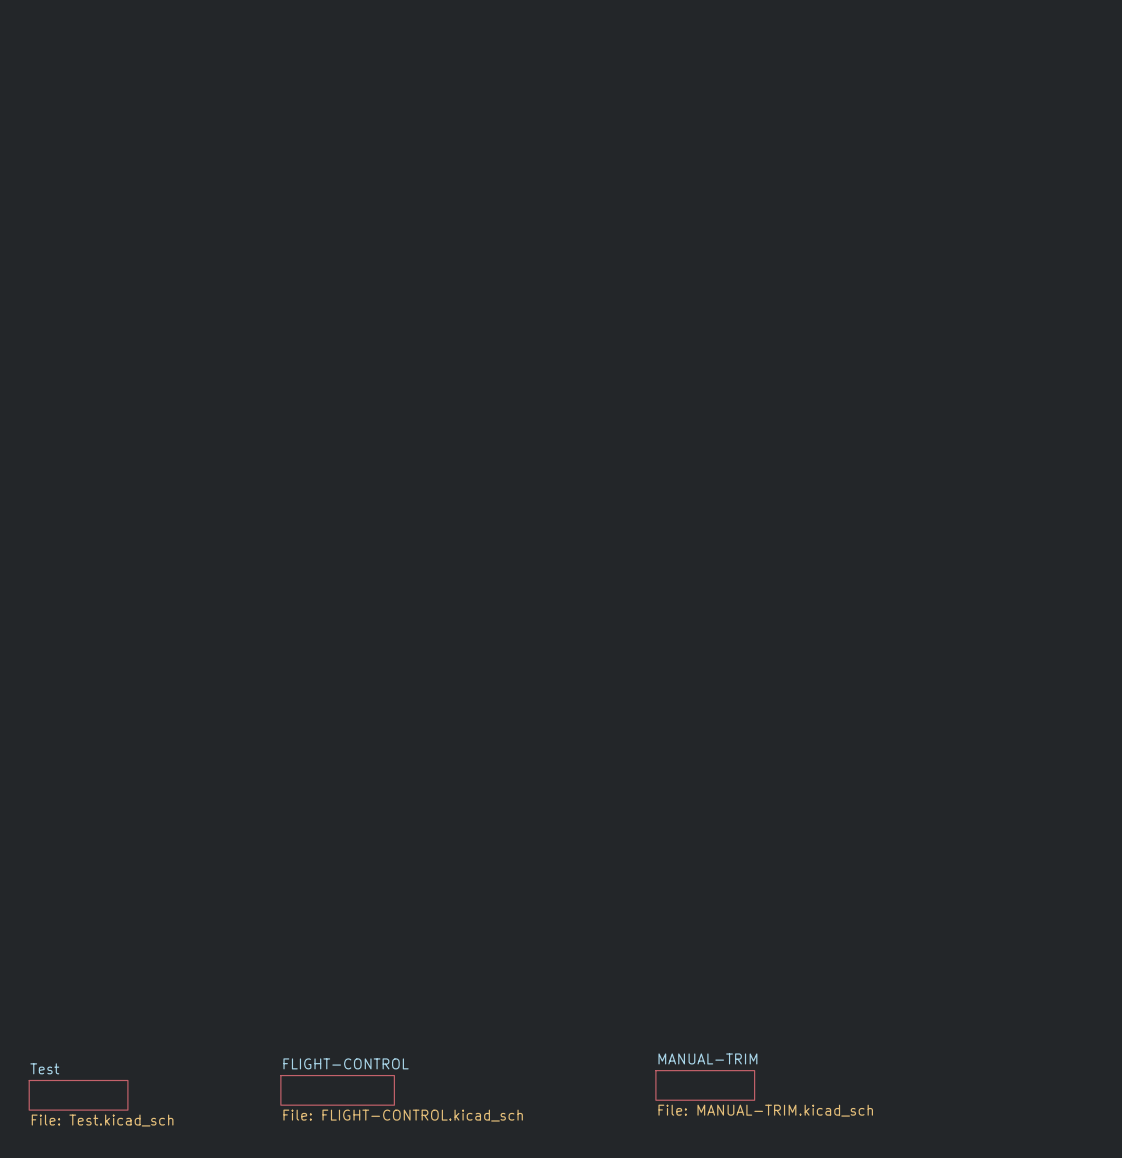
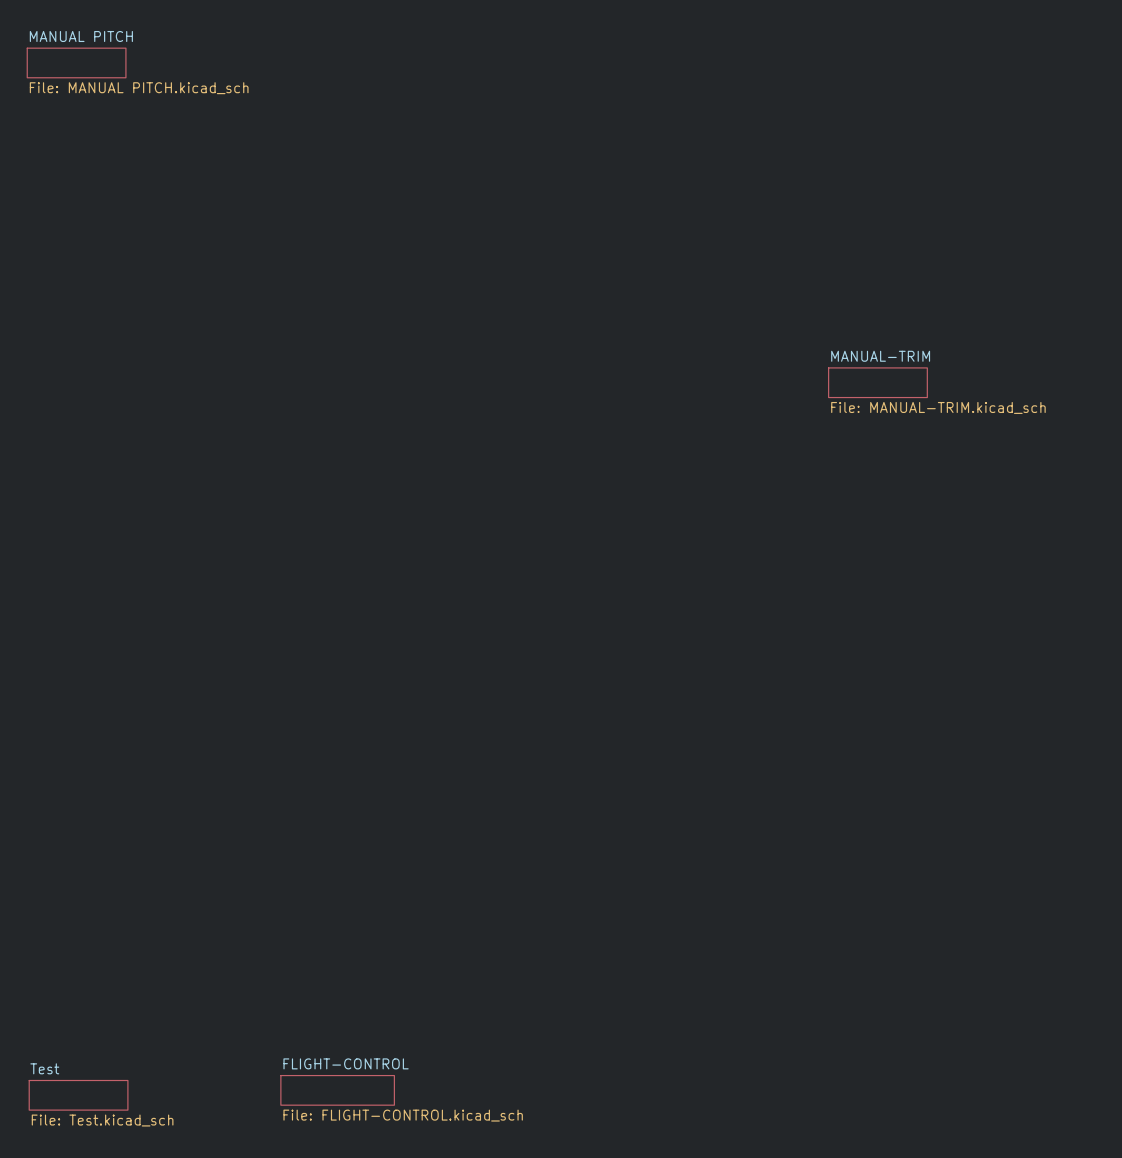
sheet MANUAL PITCH: none -> File: MANUAL PITCH.kicad_sch (76, 62)
sheet MANUAL-TRIM: none -> File: MANUAL-TRIM.kicad_sch (877, 382)
sheet MANUAL-TRIM: File: MANUAL-TRIM.kicad_sch (705, 1085) -> none

